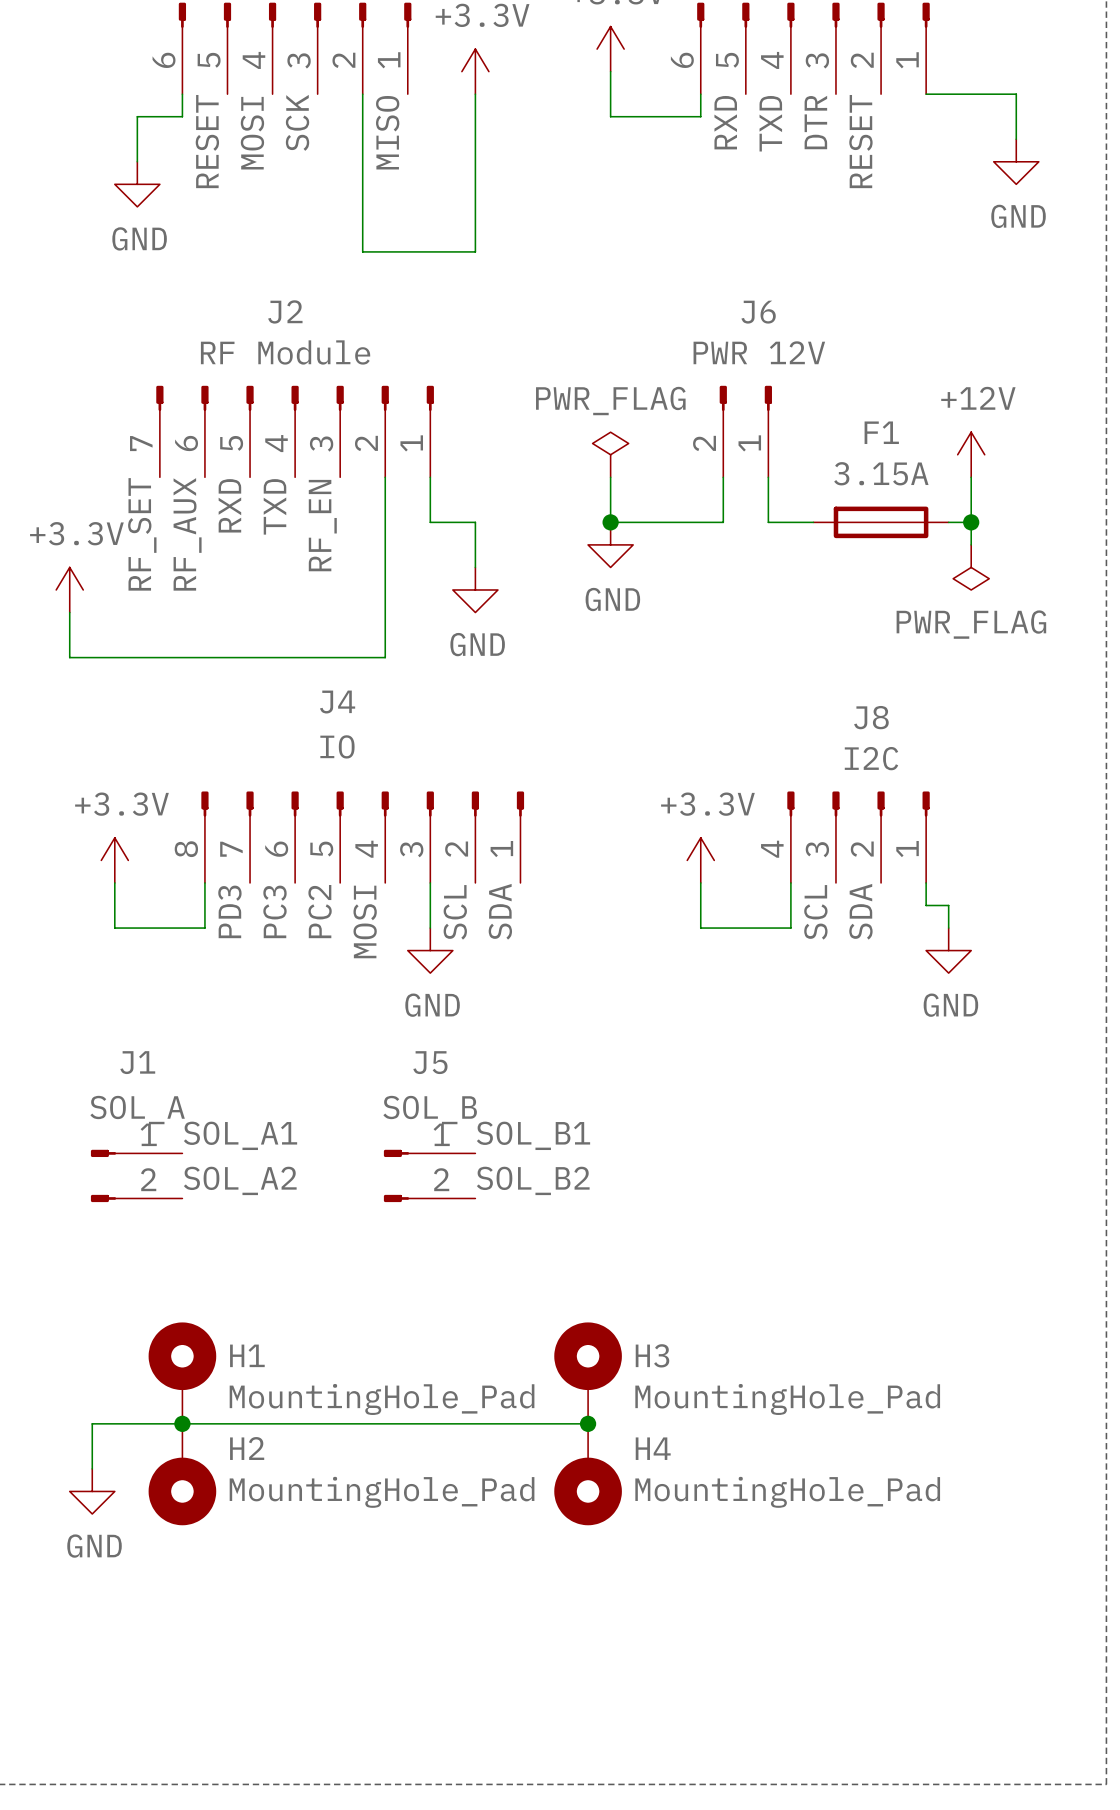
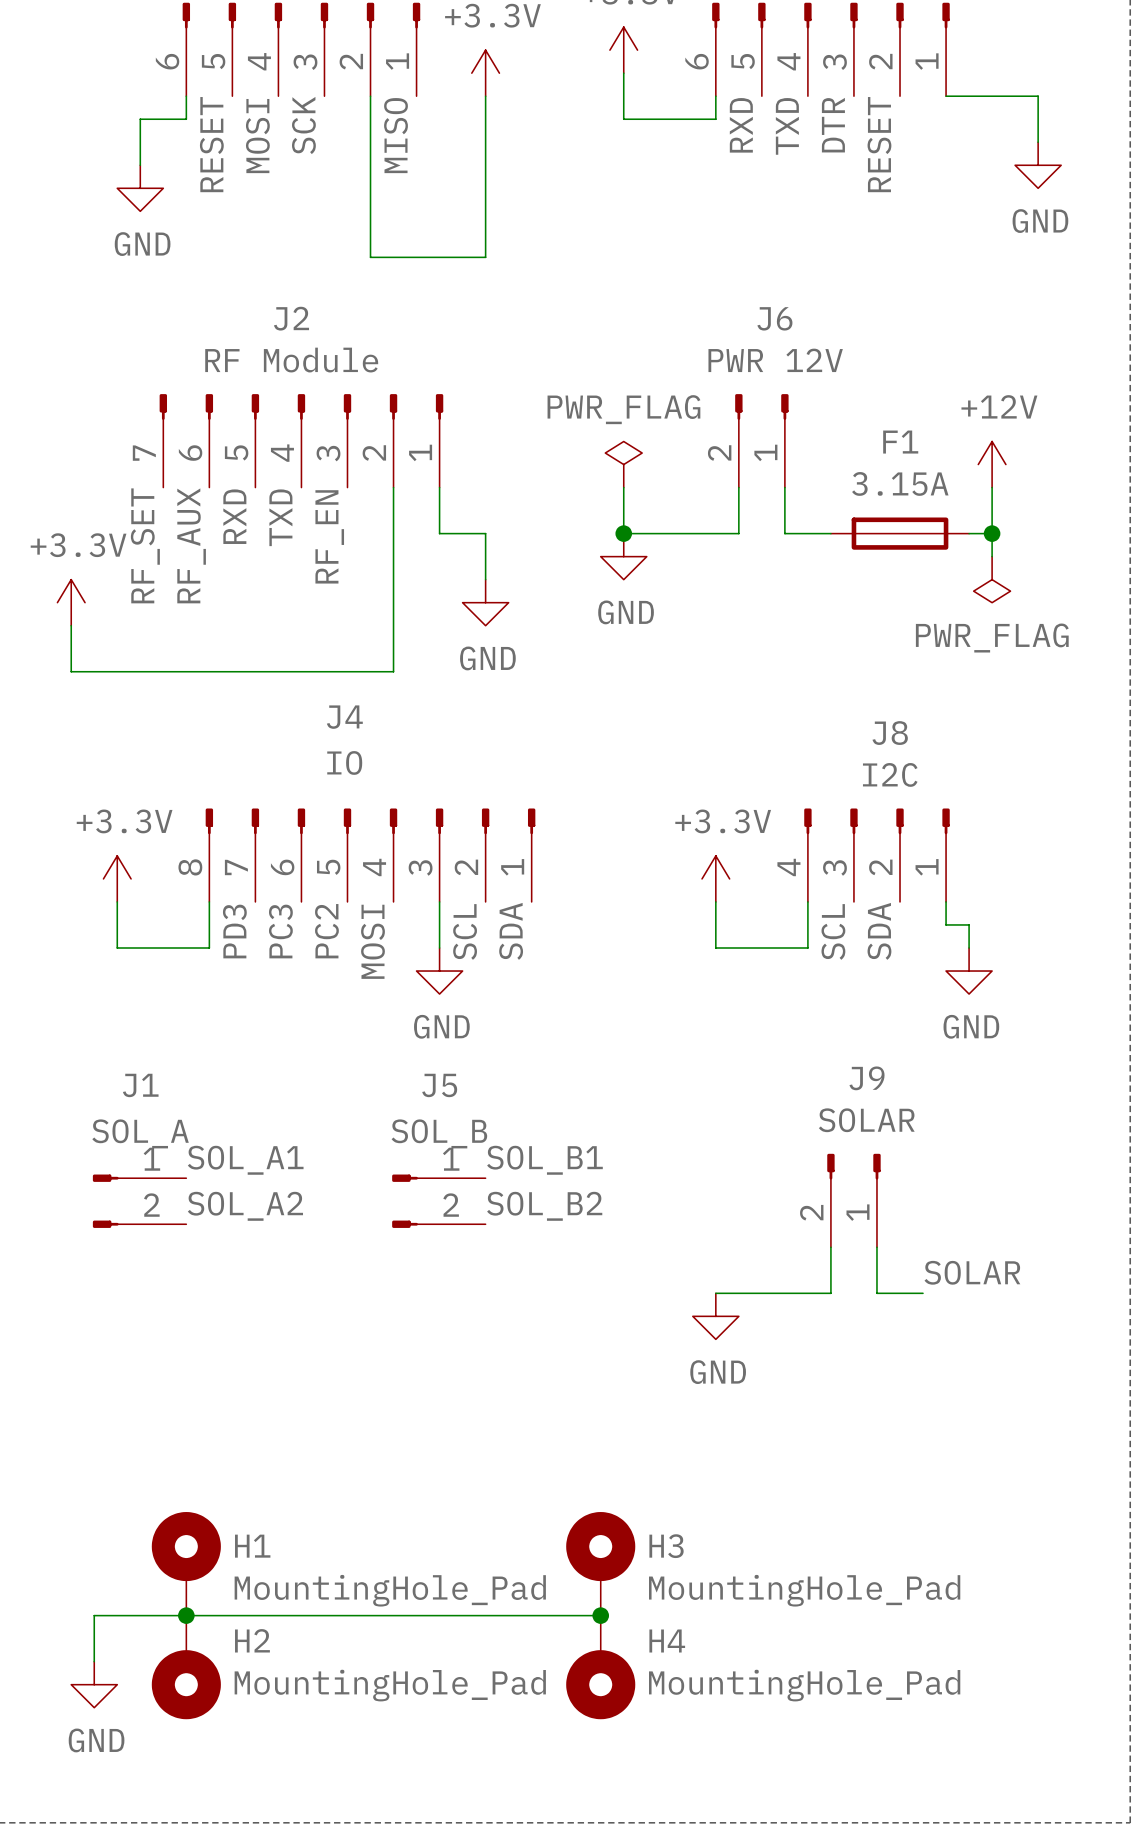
J9: none -> SOLAR (853, 1200)
wire: none -> (830, 1247) (830, 1293) (715, 1293)
wire: none -> (876, 1247) (876, 1293) (923, 1293)
label: none -> SOLAR (972, 1272)
power symbol: none -> GND (715, 1316)
H1 position: (182, 1373) -> (186, 1563)
H3 position: (588, 1373) -> (600, 1563)
junction: (182, 1423) -> none
wire: (588, 1423) (92, 1423) (92, 1468) -> (600, 1615) (94, 1615) (94, 1661)
junction: (588, 1423) -> none
H2 position: (182, 1474) -> (186, 1667)
H4 position: (588, 1474) -> (600, 1667)
power symbol position: GND (92, 1491) -> GND (94, 1684)
junction: none -> (186, 1615)
junction: none -> (600, 1615)

